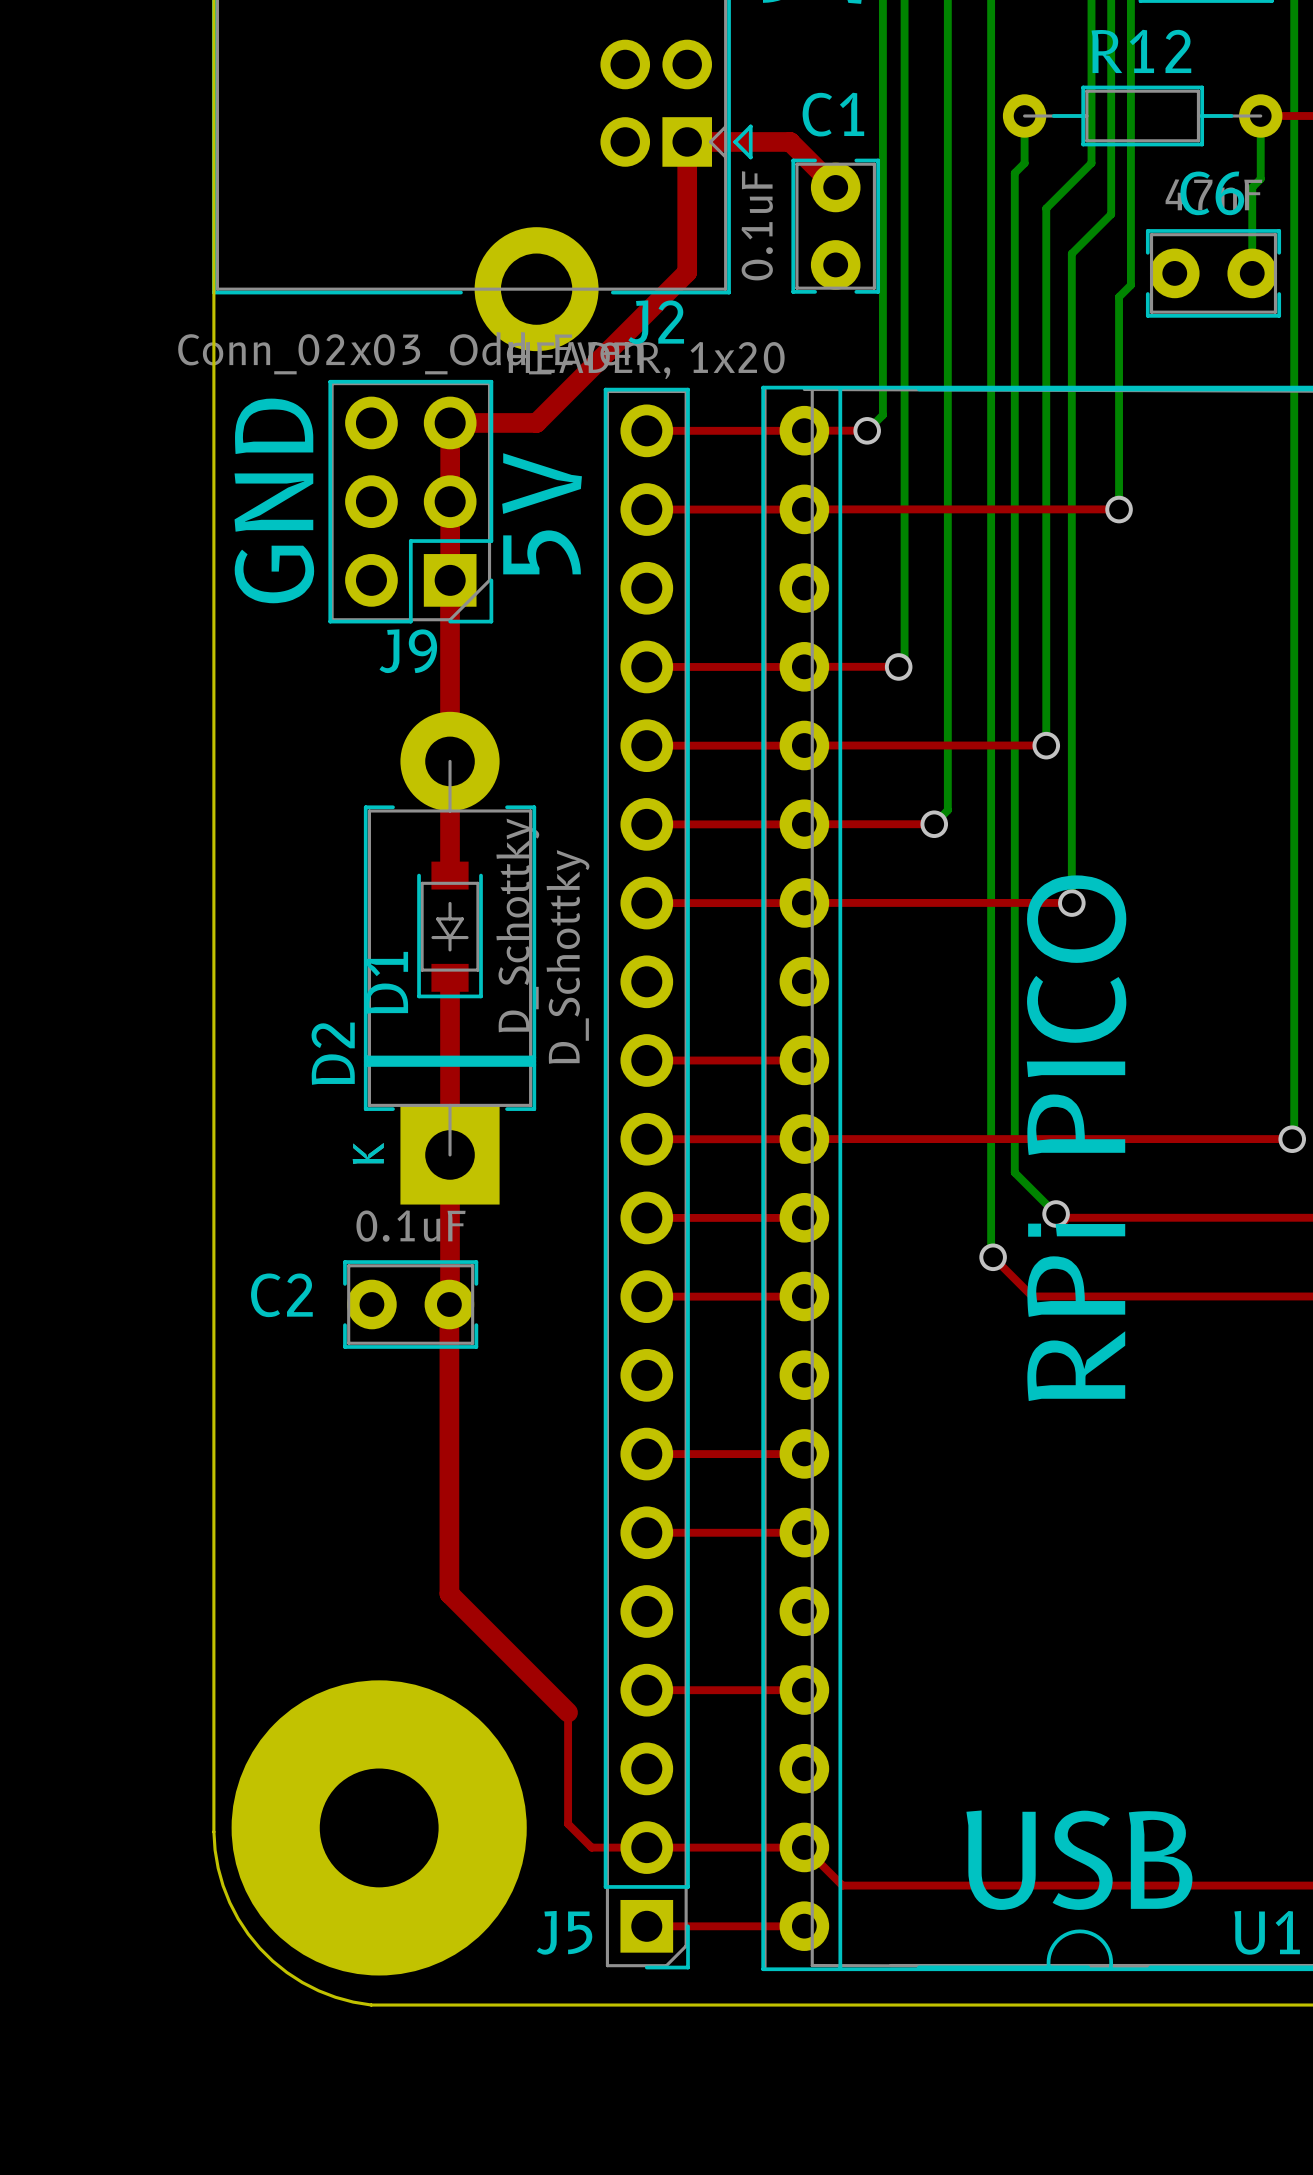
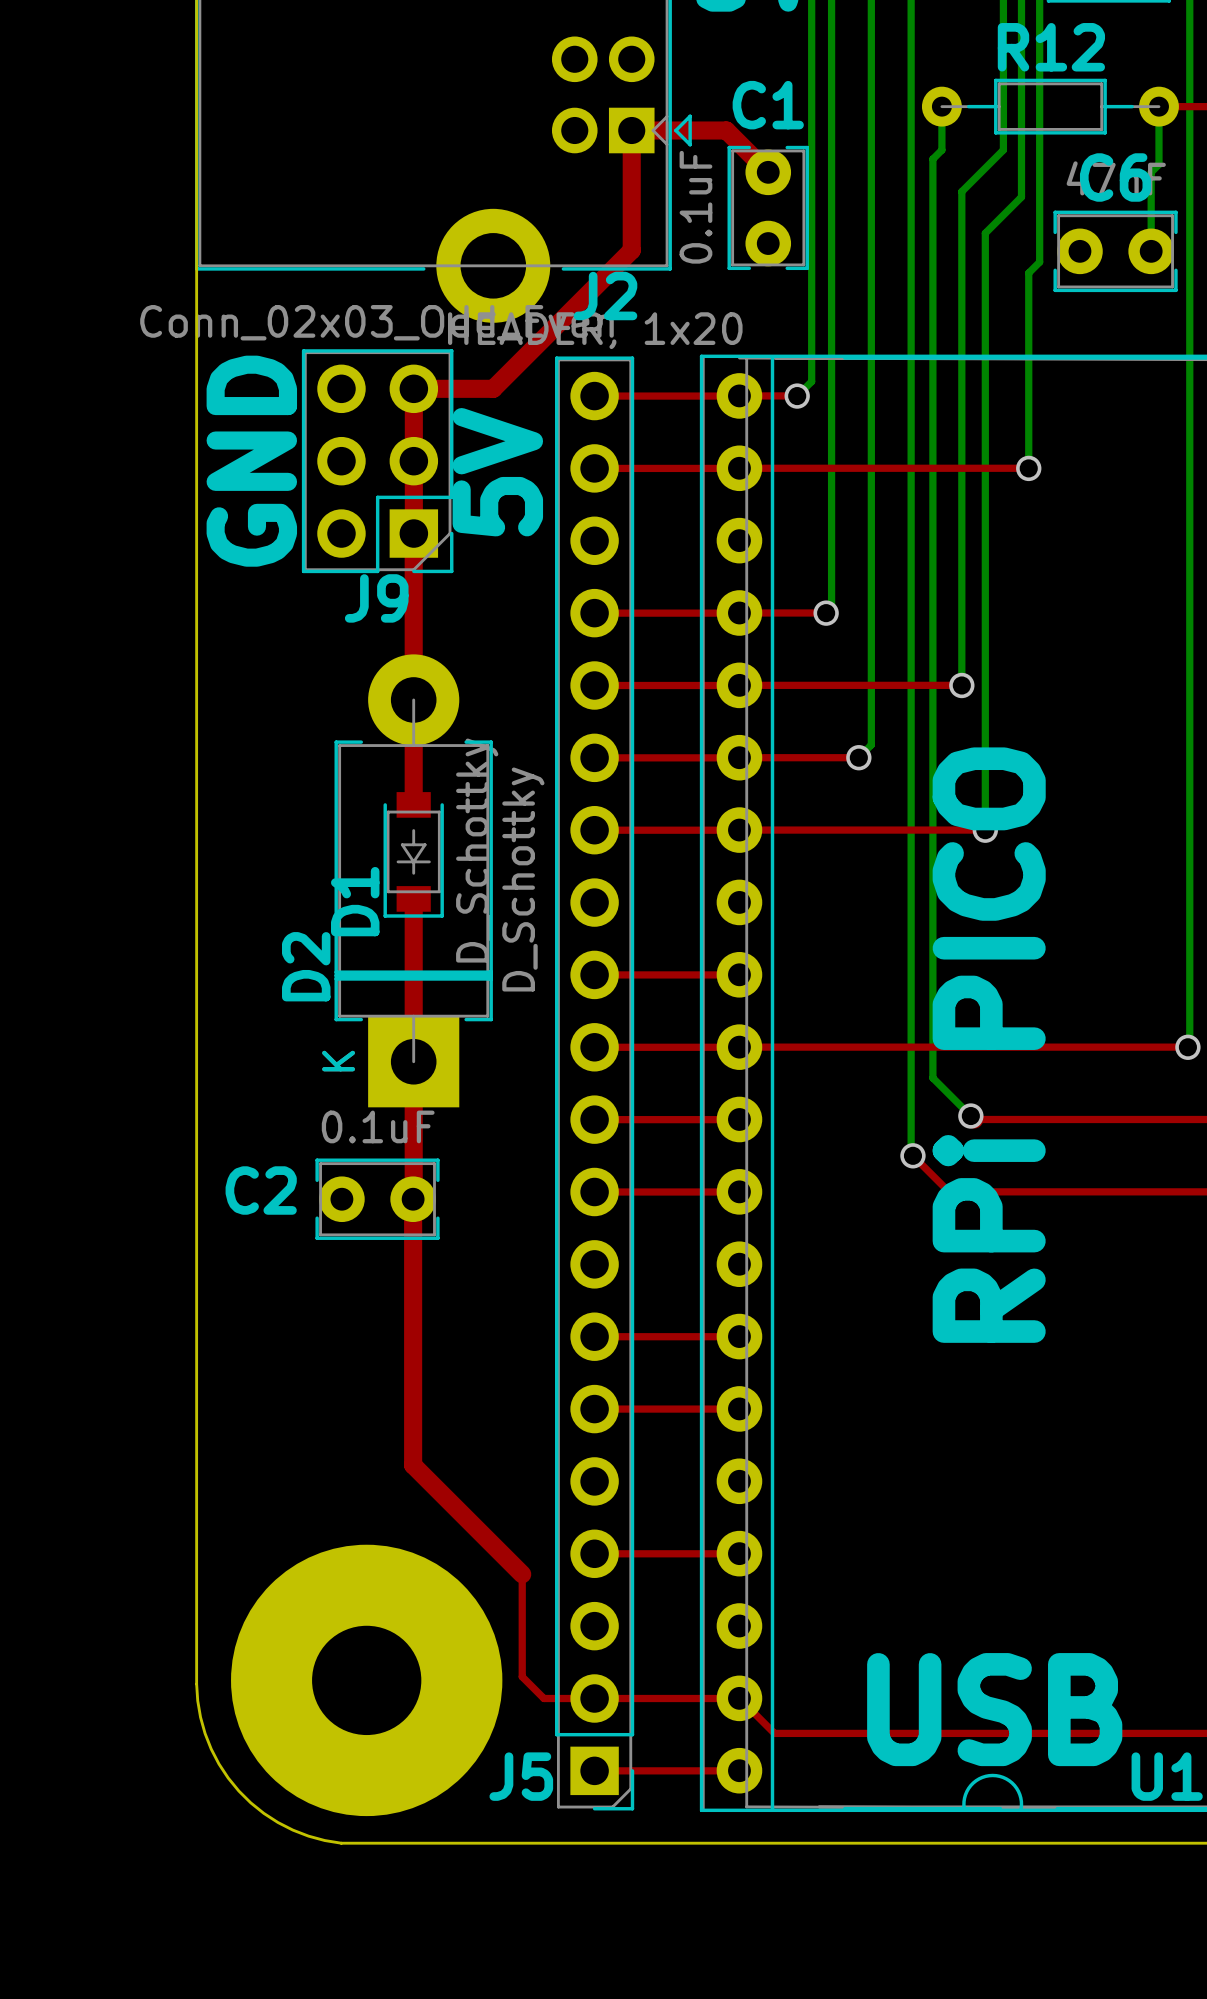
part position: (379, 1827) -> (366, 1680)

